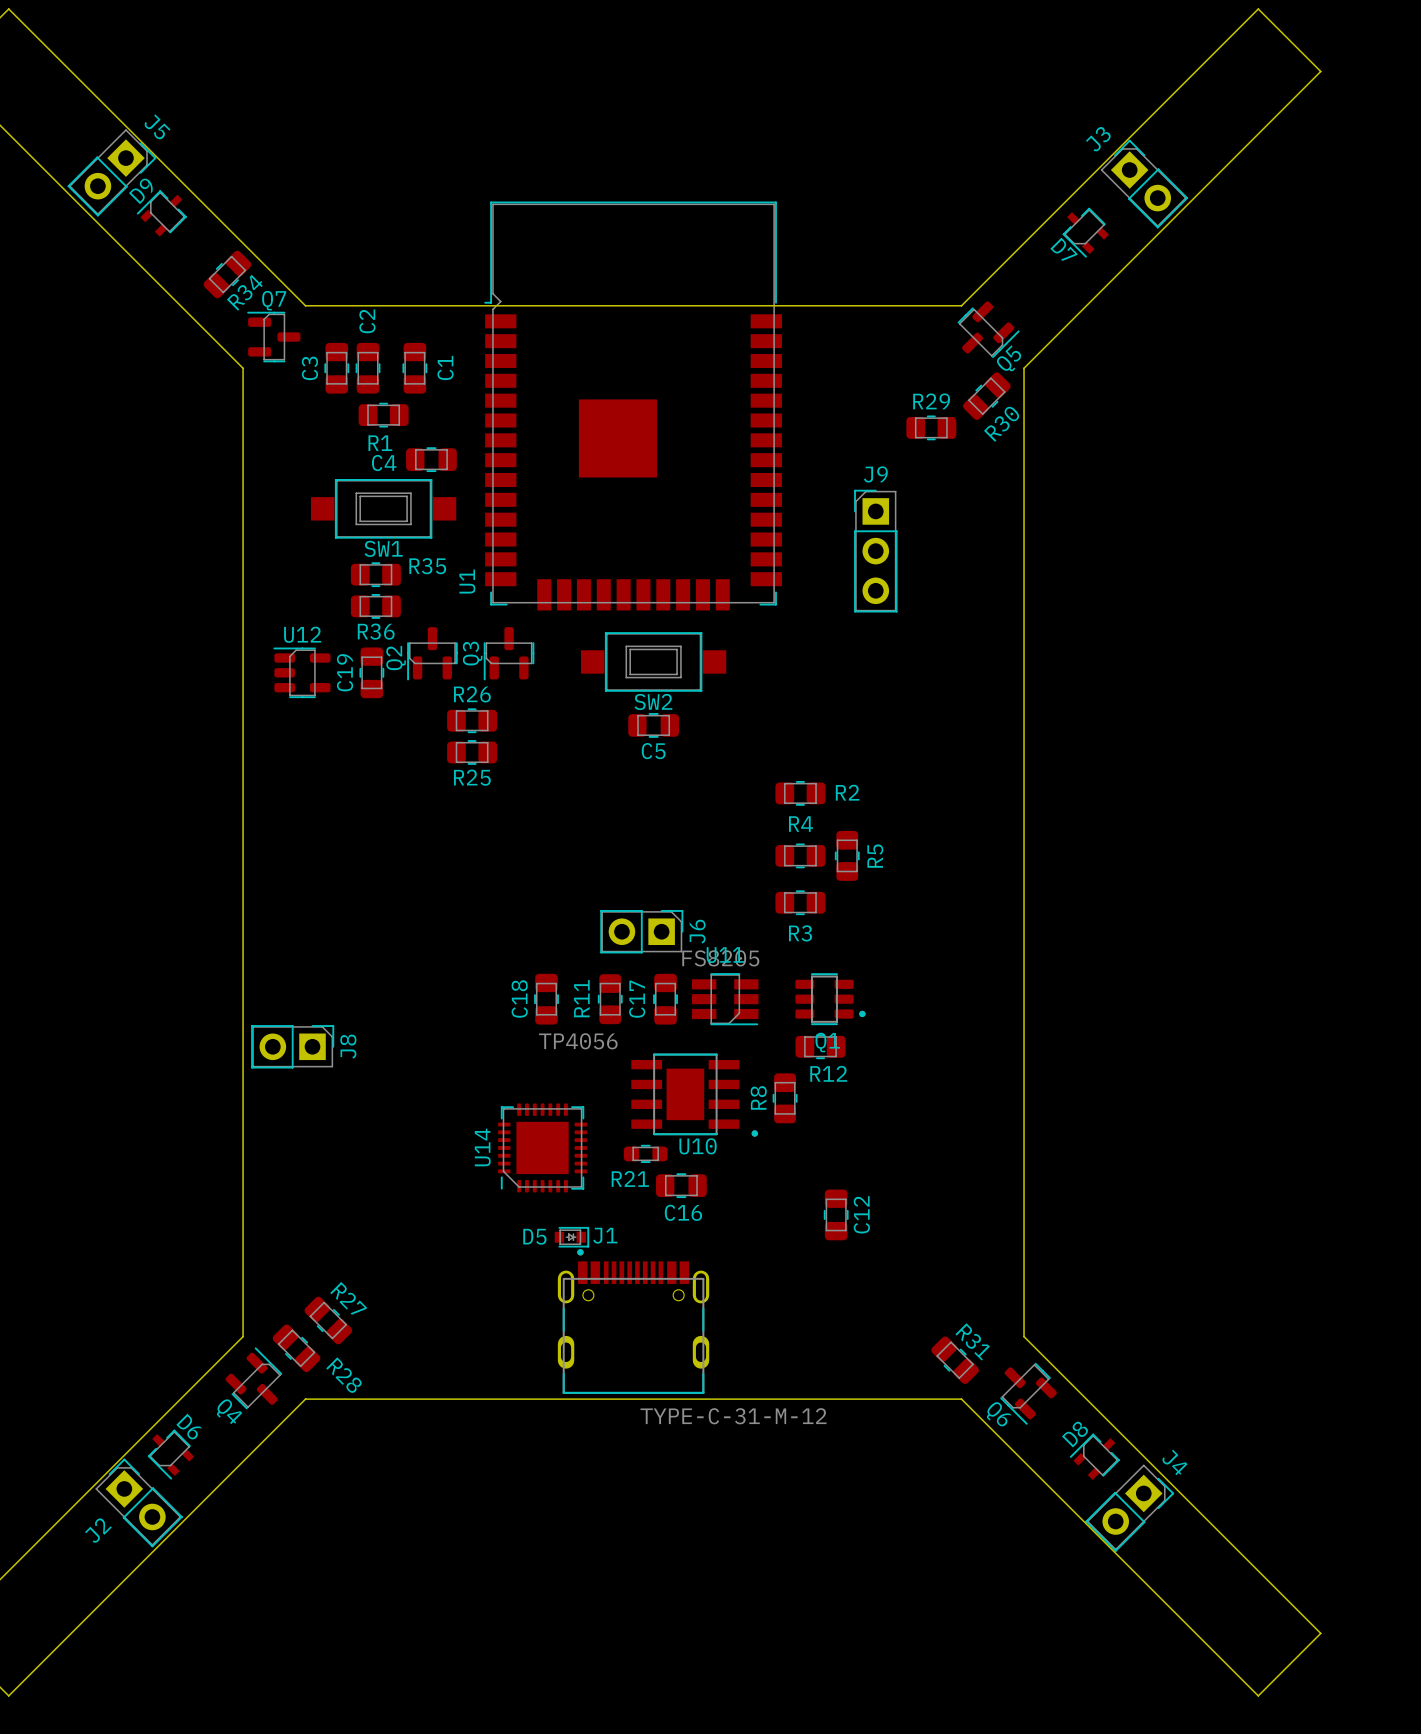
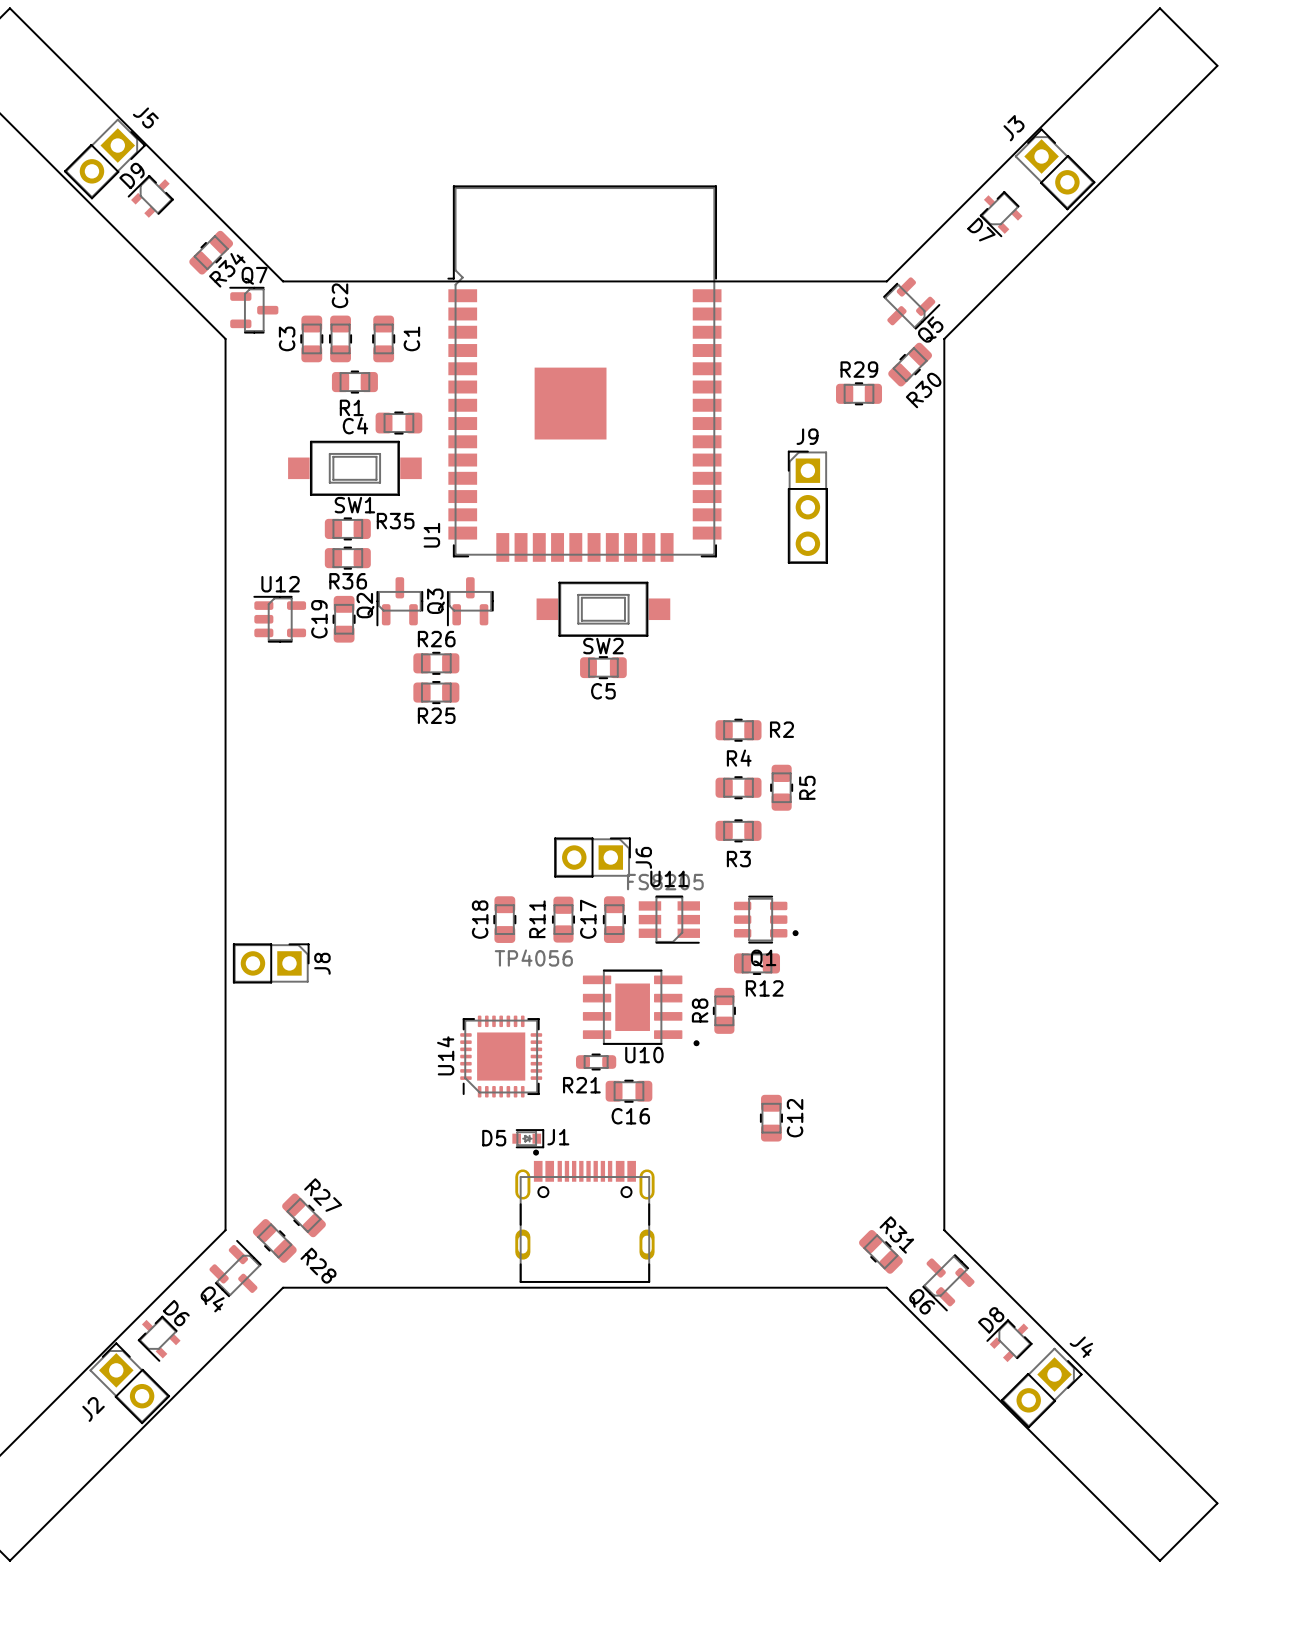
J1 value: TYPE-C-31-M-12 (733, 1416) -> none

